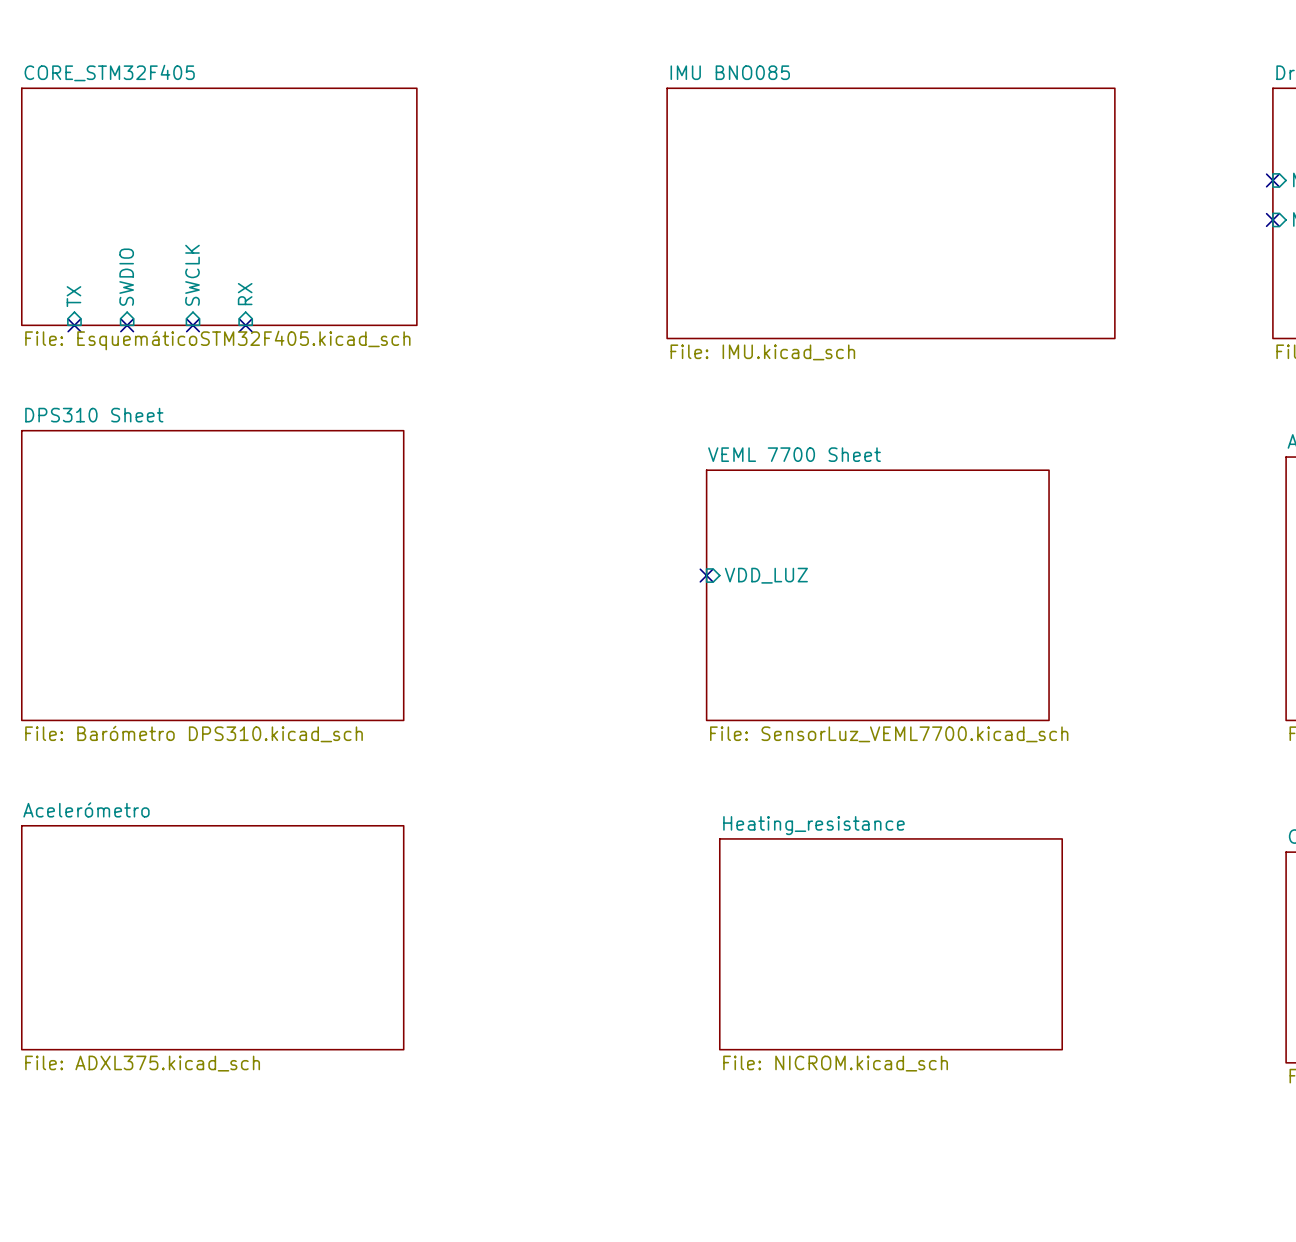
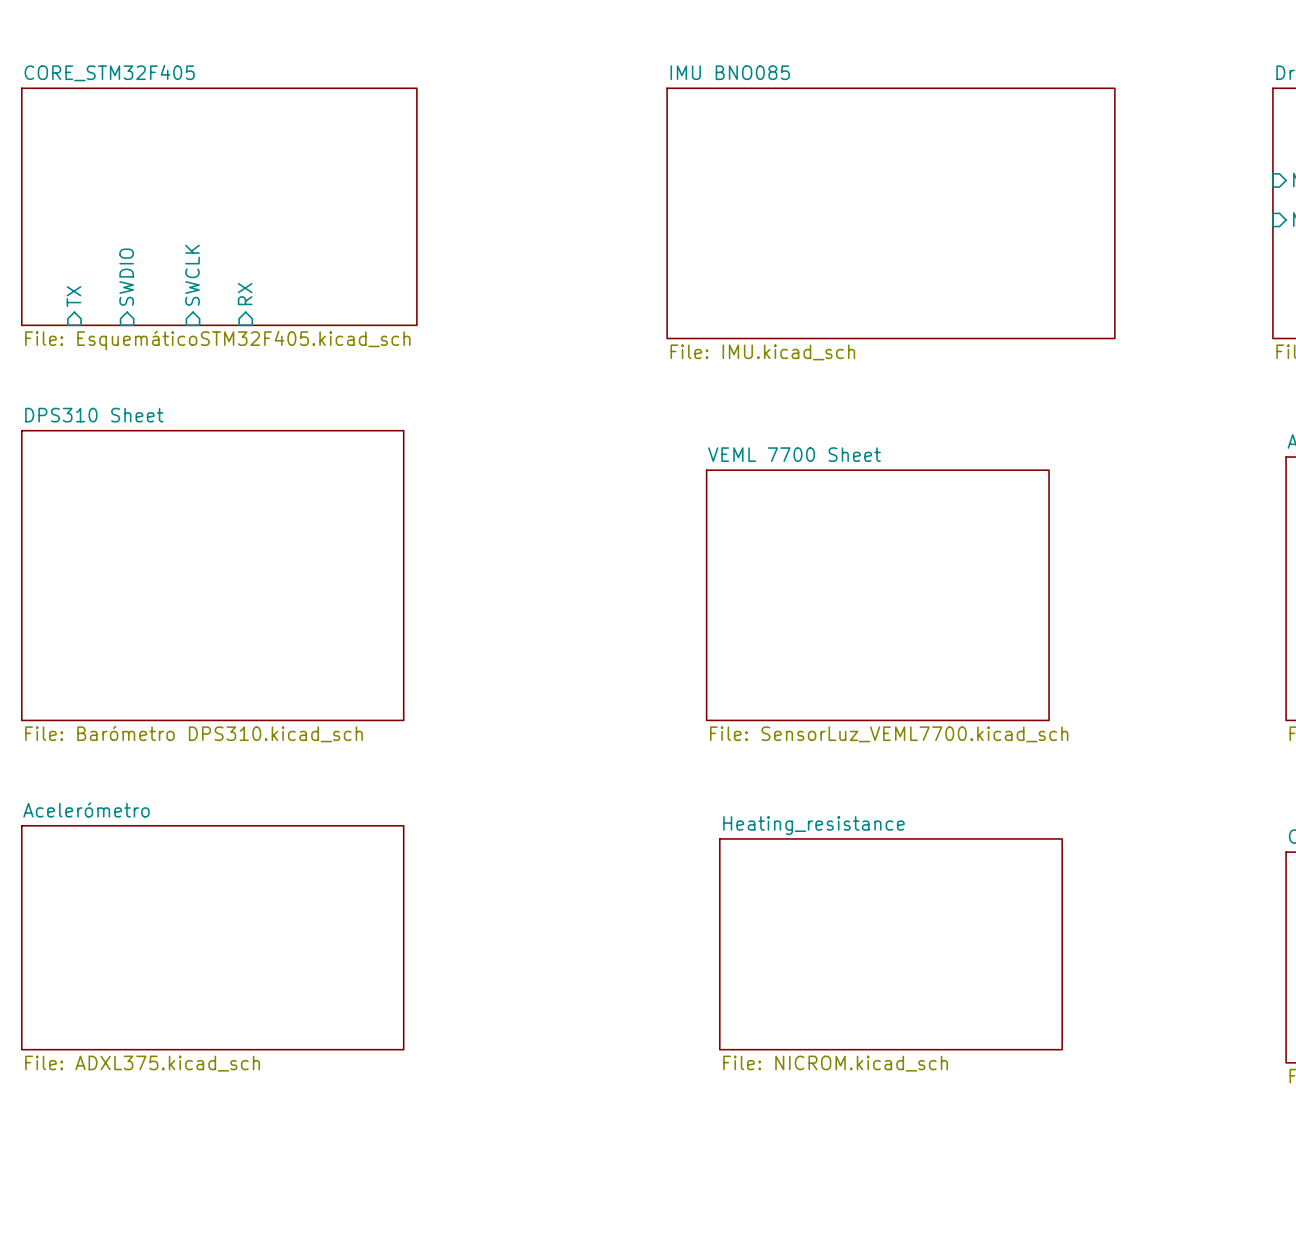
no-connect mark: (1272, 180) -> none
no-connect mark: (1272, 219) -> none
no-connect mark: (74, 325) -> none
no-connect mark: (127, 325) -> none
no-connect mark: (192, 325) -> none
no-connect mark: (245, 325) -> none
no-connect mark: (706, 575) -> none
sheet pin: VDD_LUZ (766, 575) -> none

